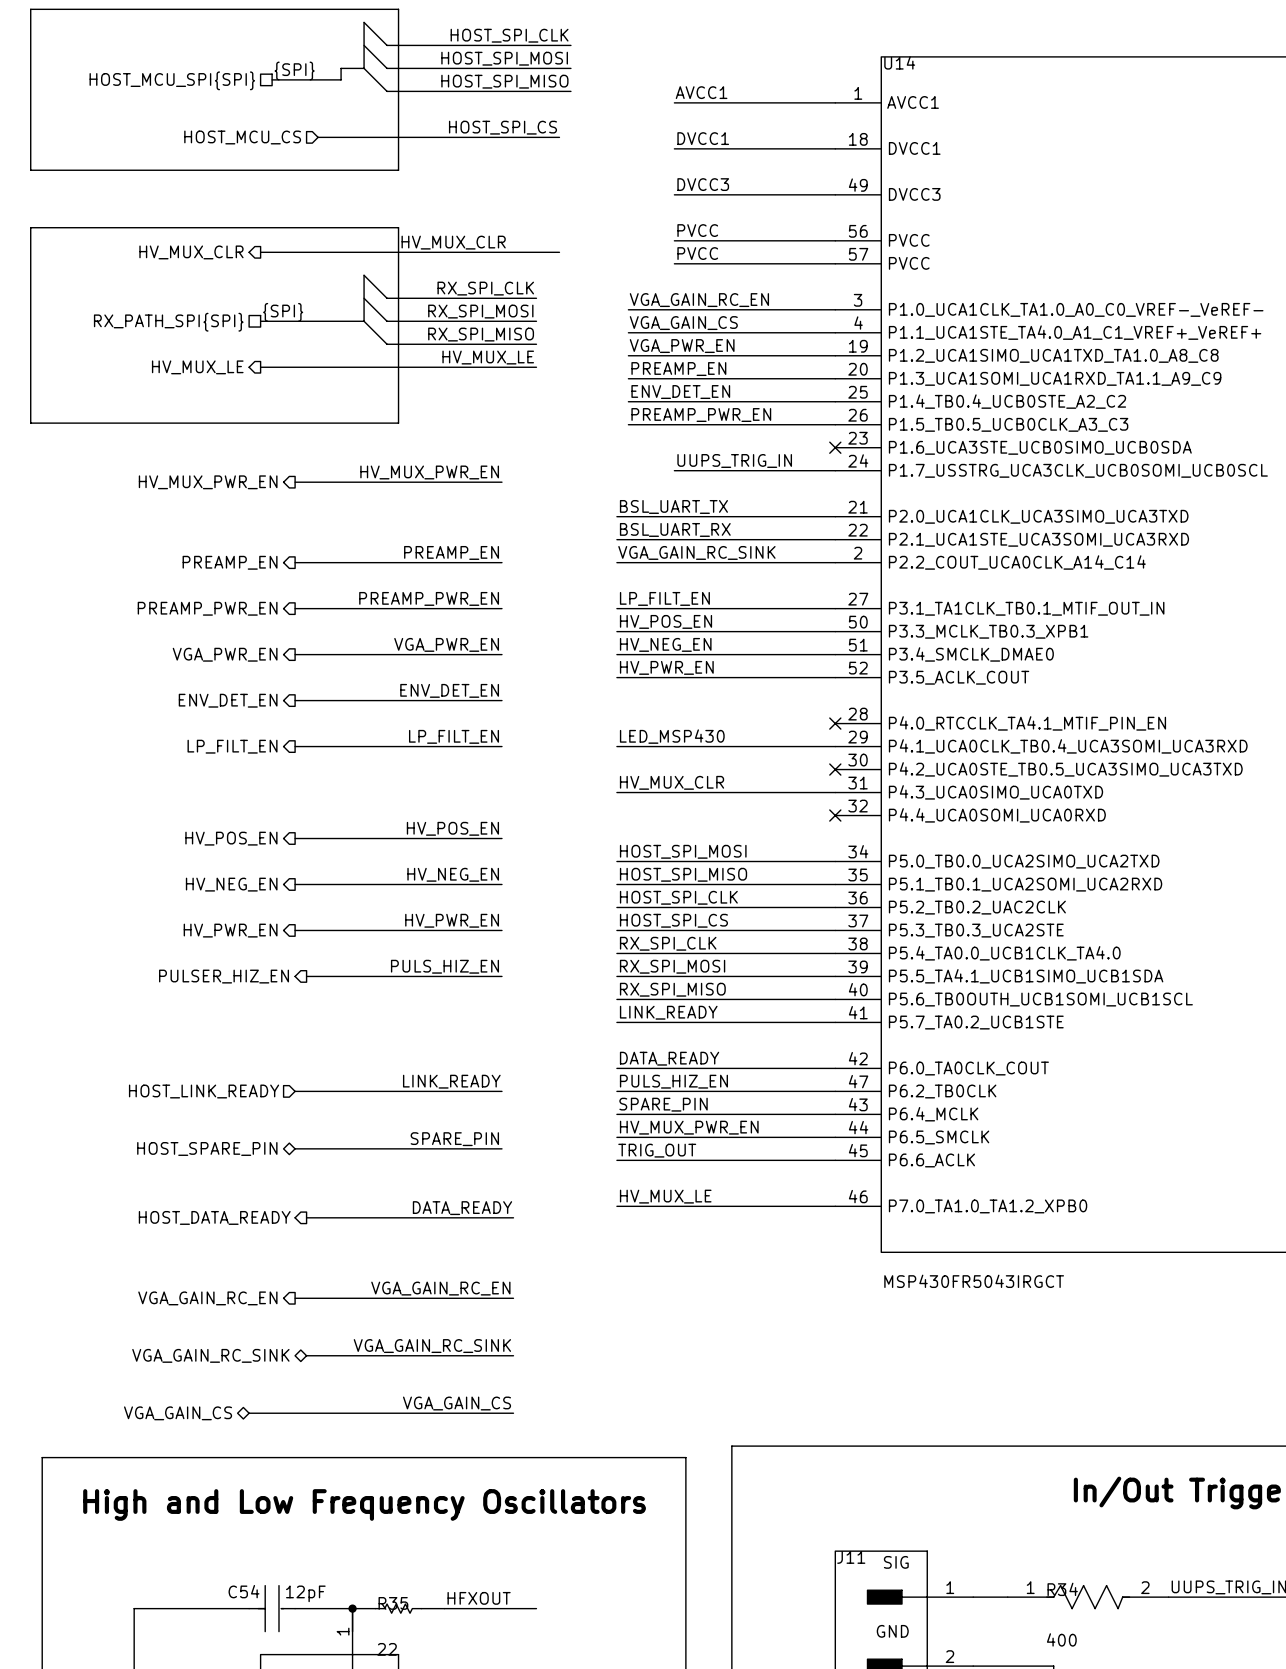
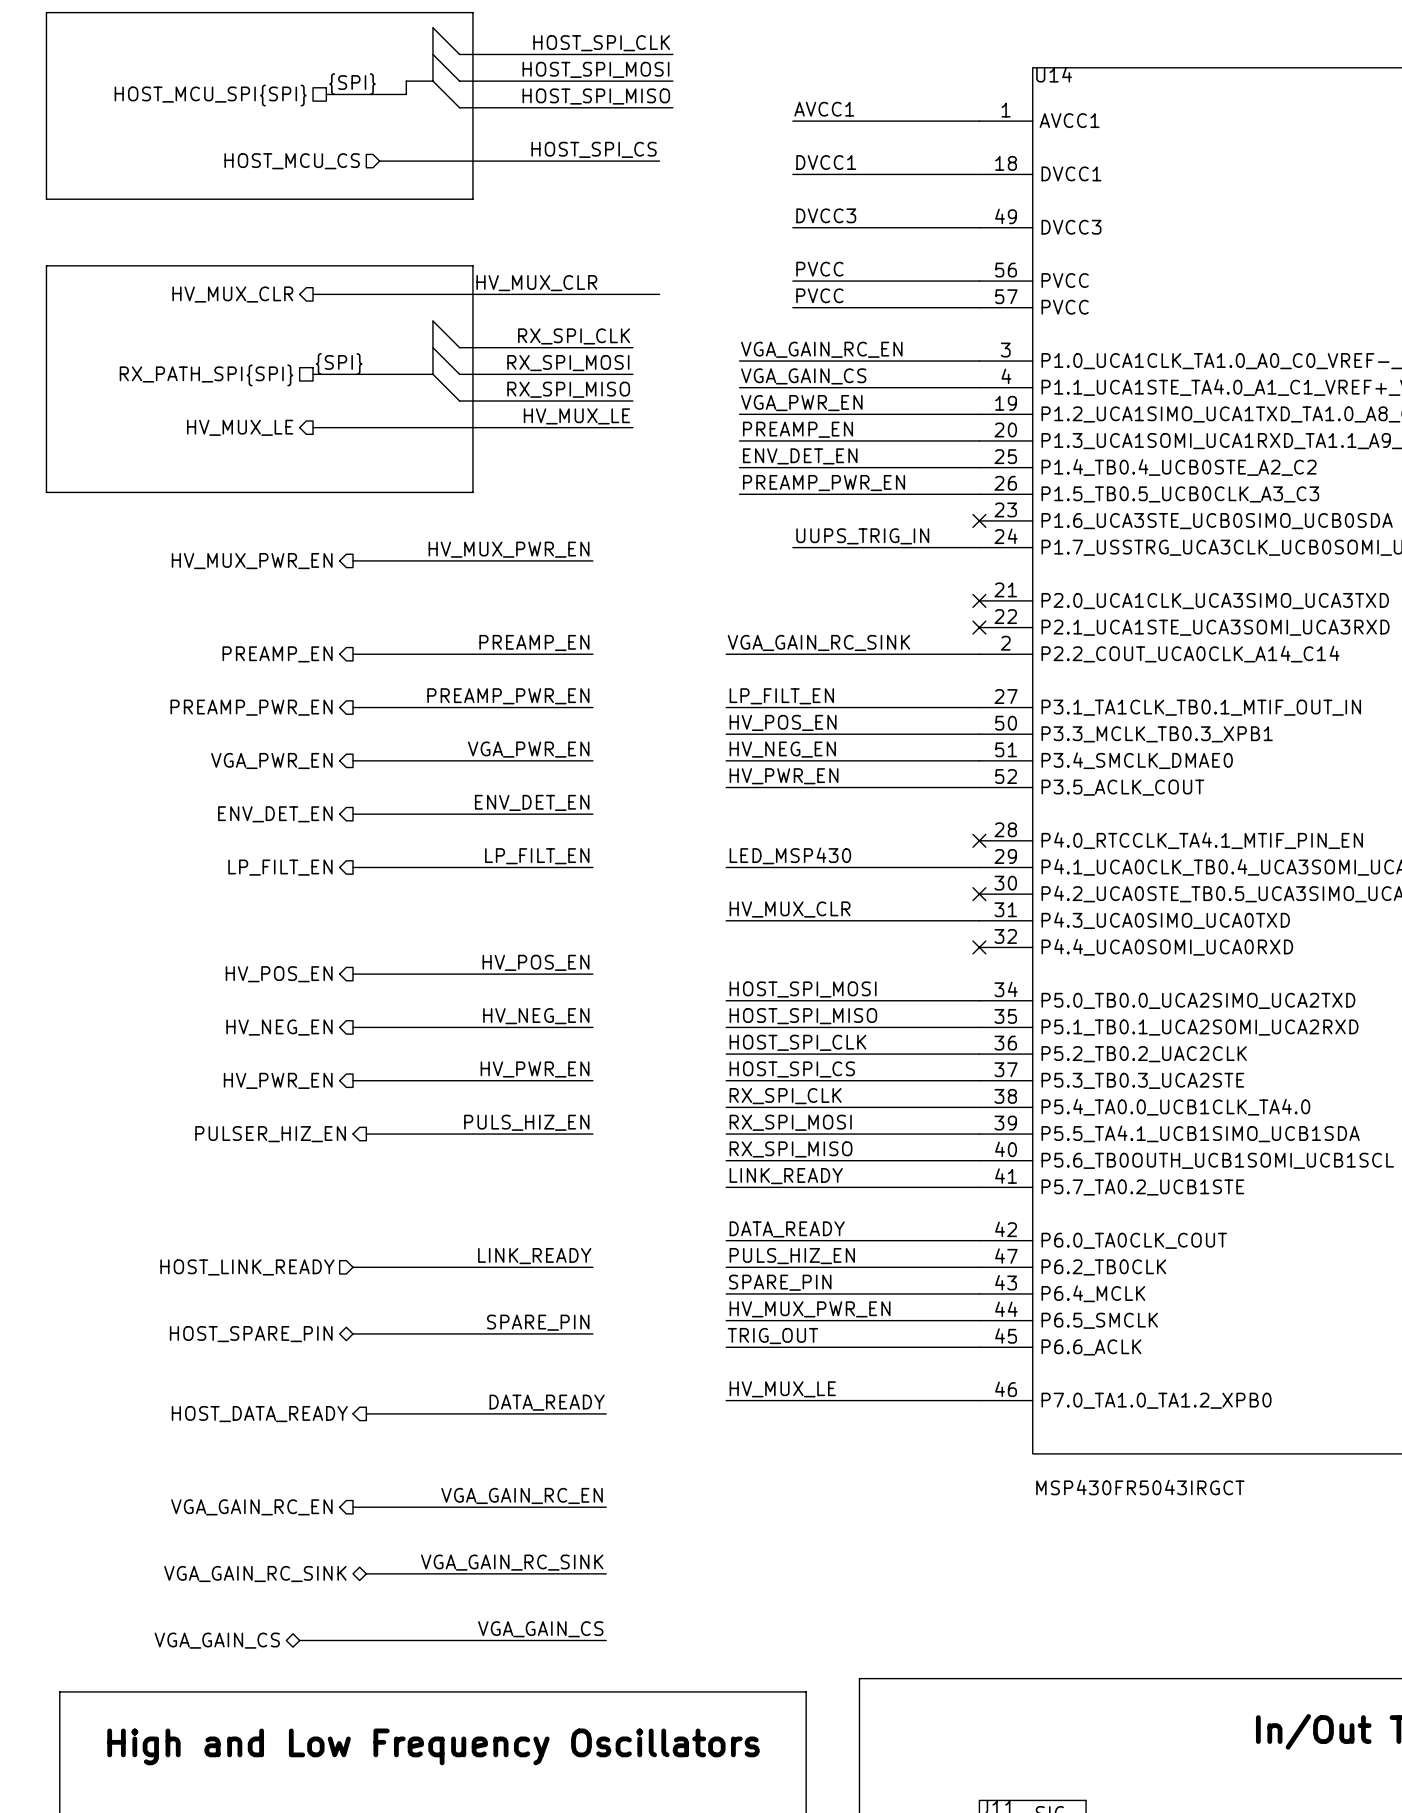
label: BSL_UART_TX (673, 506) -> none
wire: (616, 516) (835, 516) -> none
no-connect mark: none -> (979, 600)
label: BSL_UART_RX (675, 529) -> none
wire: (616, 539) (835, 539) -> none
no-connect mark: none -> (979, 627)

